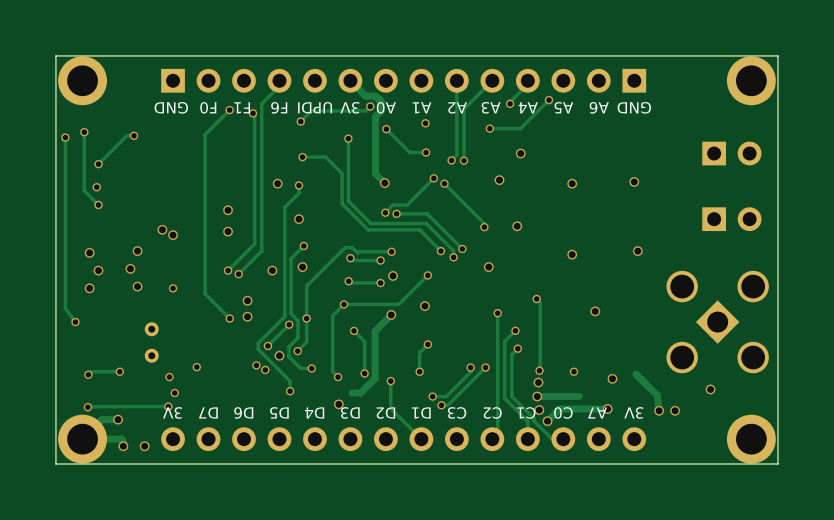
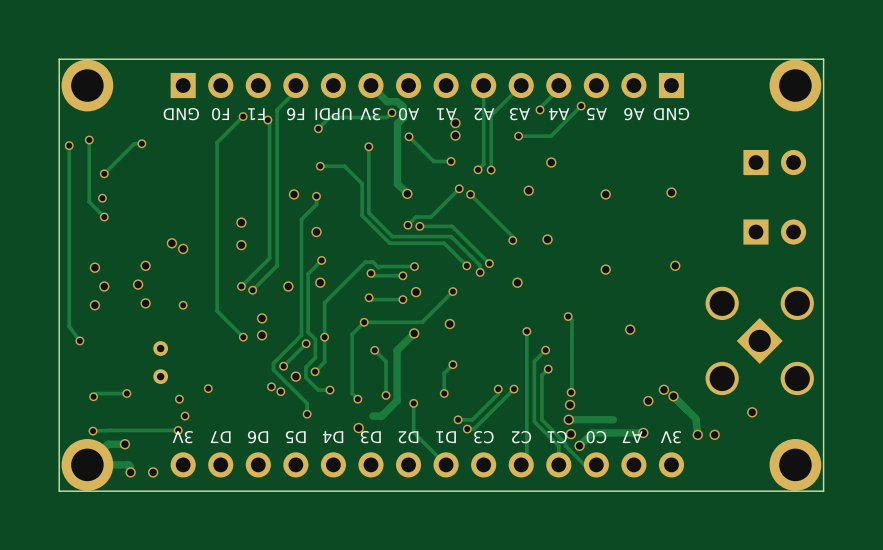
via: none -> (455, 123)
via: (425, 123) -> none
via: none -> (455, 135)
via: none -> (663, 389)
via: (573, 371) -> none
via: none -> (673, 396)

